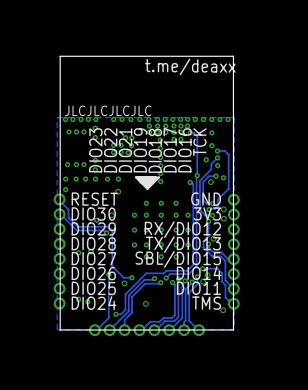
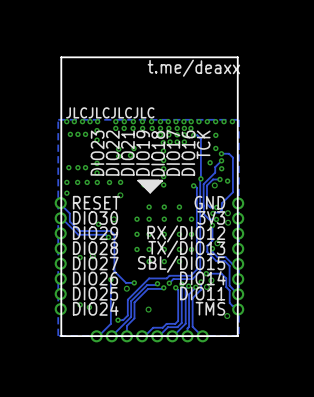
via: none -> (115, 128)
via: none -> (124, 128)
via: none -> (133, 128)
via: none -> (142, 128)
via: (149, 132) -> none
via: (125, 137) -> none
via: (131, 137) -> none
via: none -> (170, 142)
via: (113, 145) -> none
via: (121, 145) -> none
via: none -> (118, 149)
via: (113, 152) -> none
via: (121, 152) -> none
via: none -> (118, 156)

